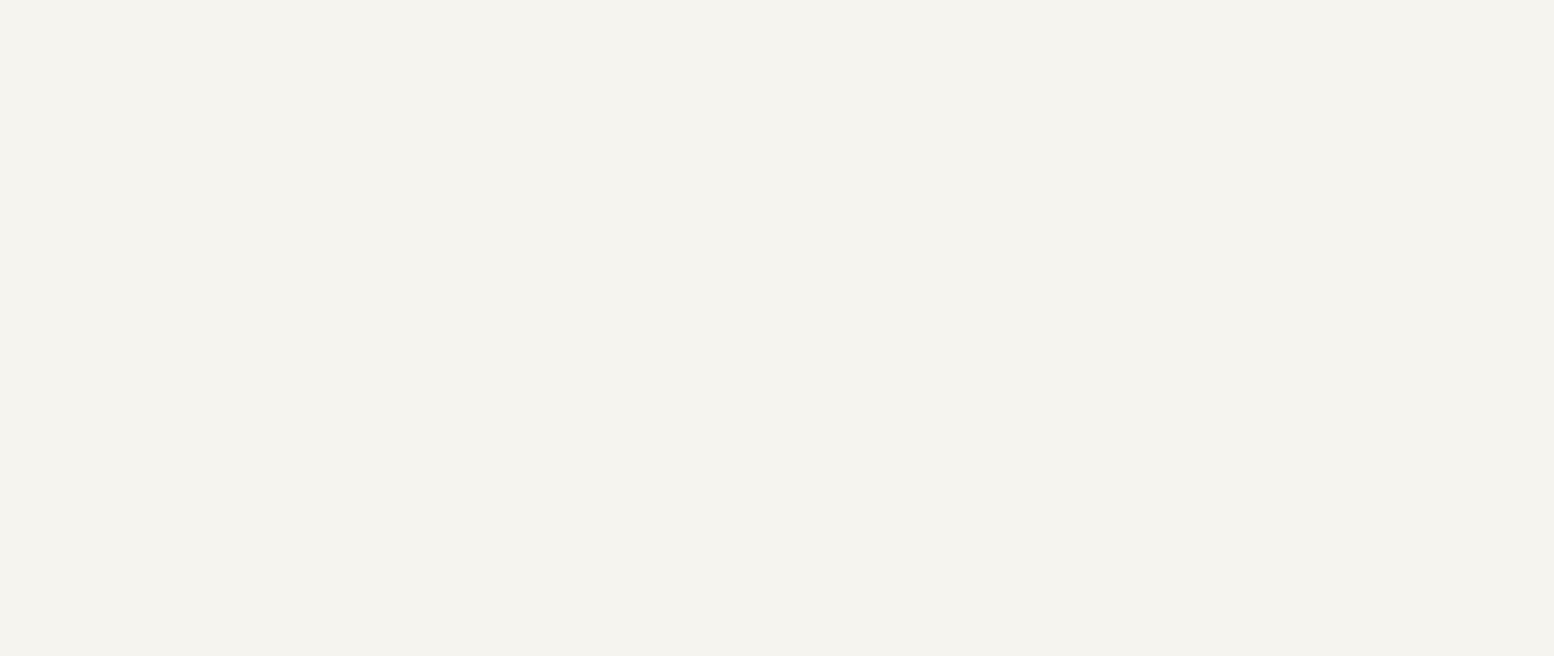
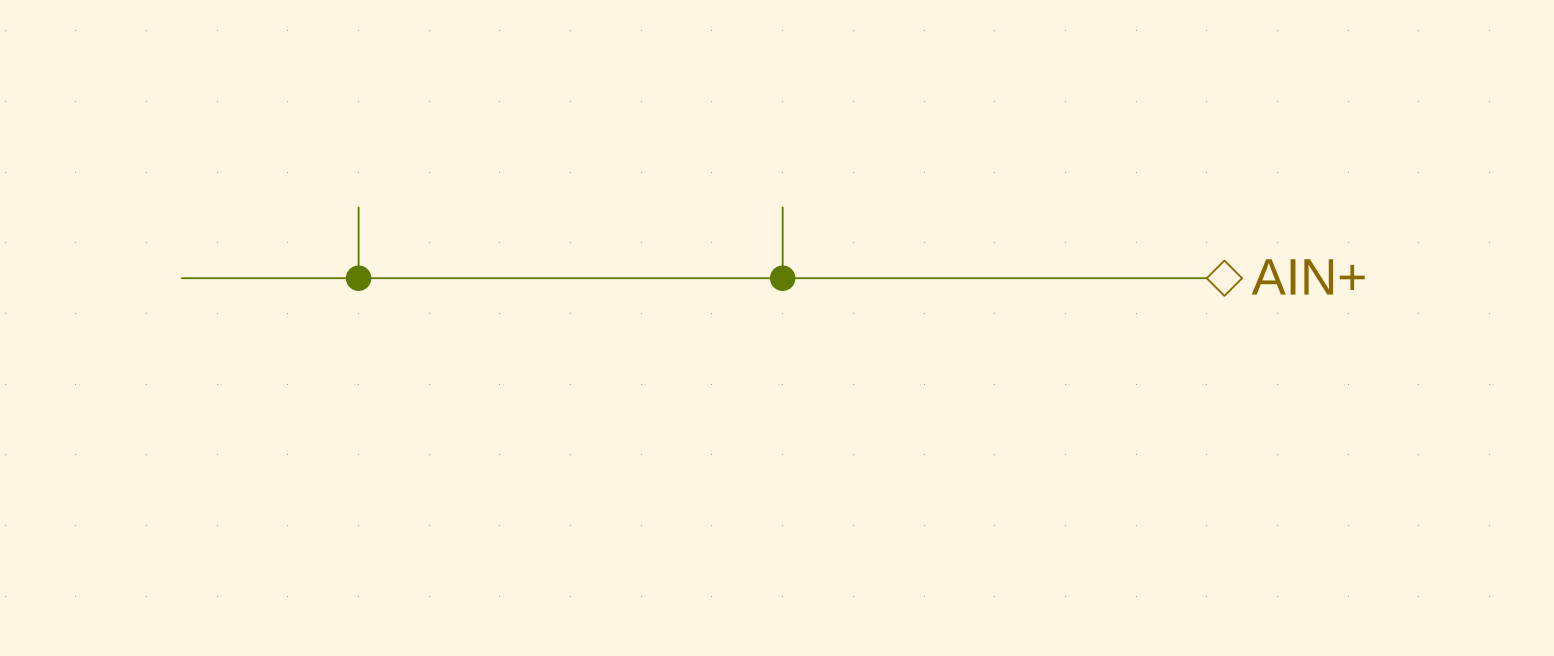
wire: none -> (358, 207) (358, 278)
wire: none -> (782, 207) (782, 278)
hierarchical label: none -> AIN+ (1308, 276)
wire: none -> (181, 278) (1206, 278)
junction: none -> (358, 278)
junction: none -> (782, 278)

